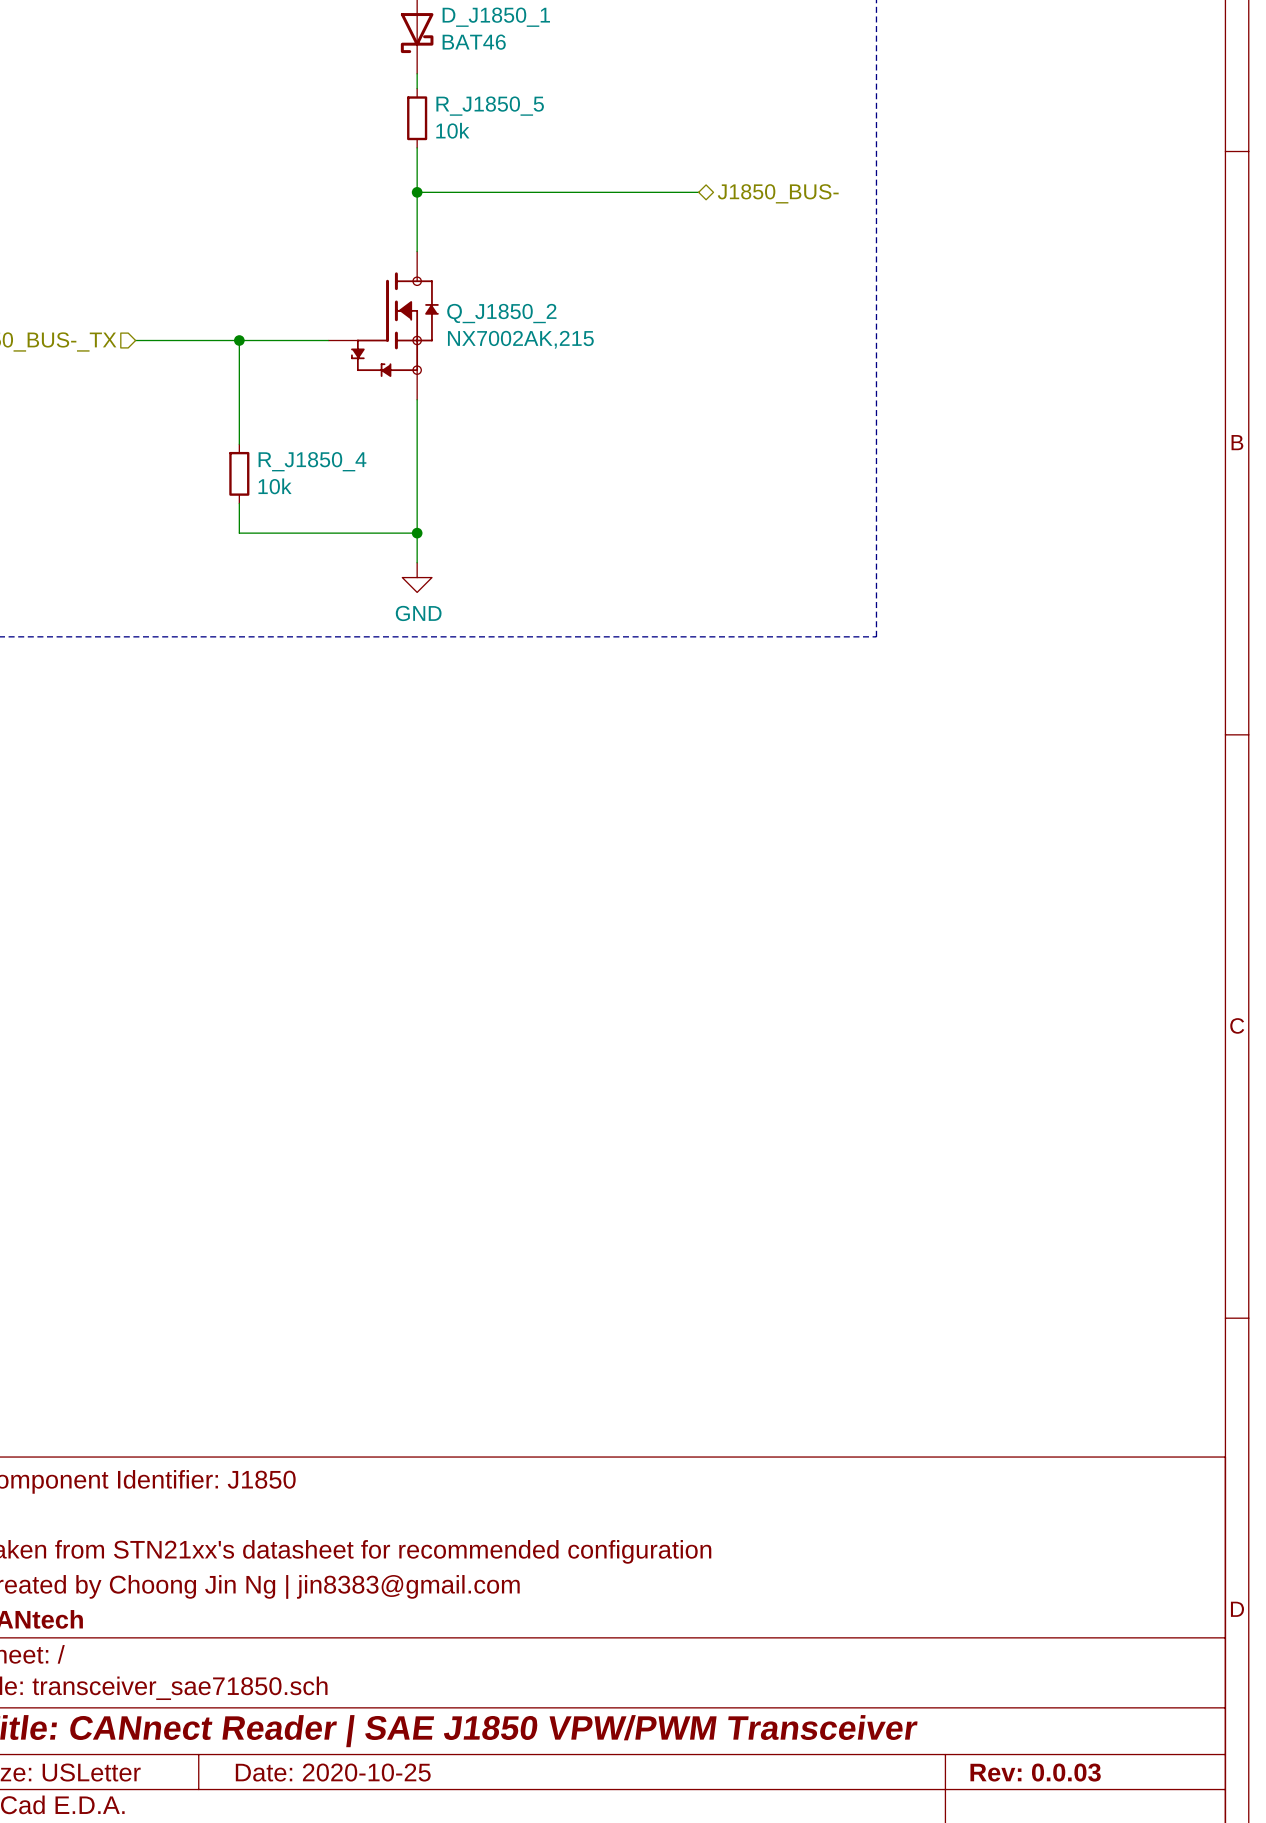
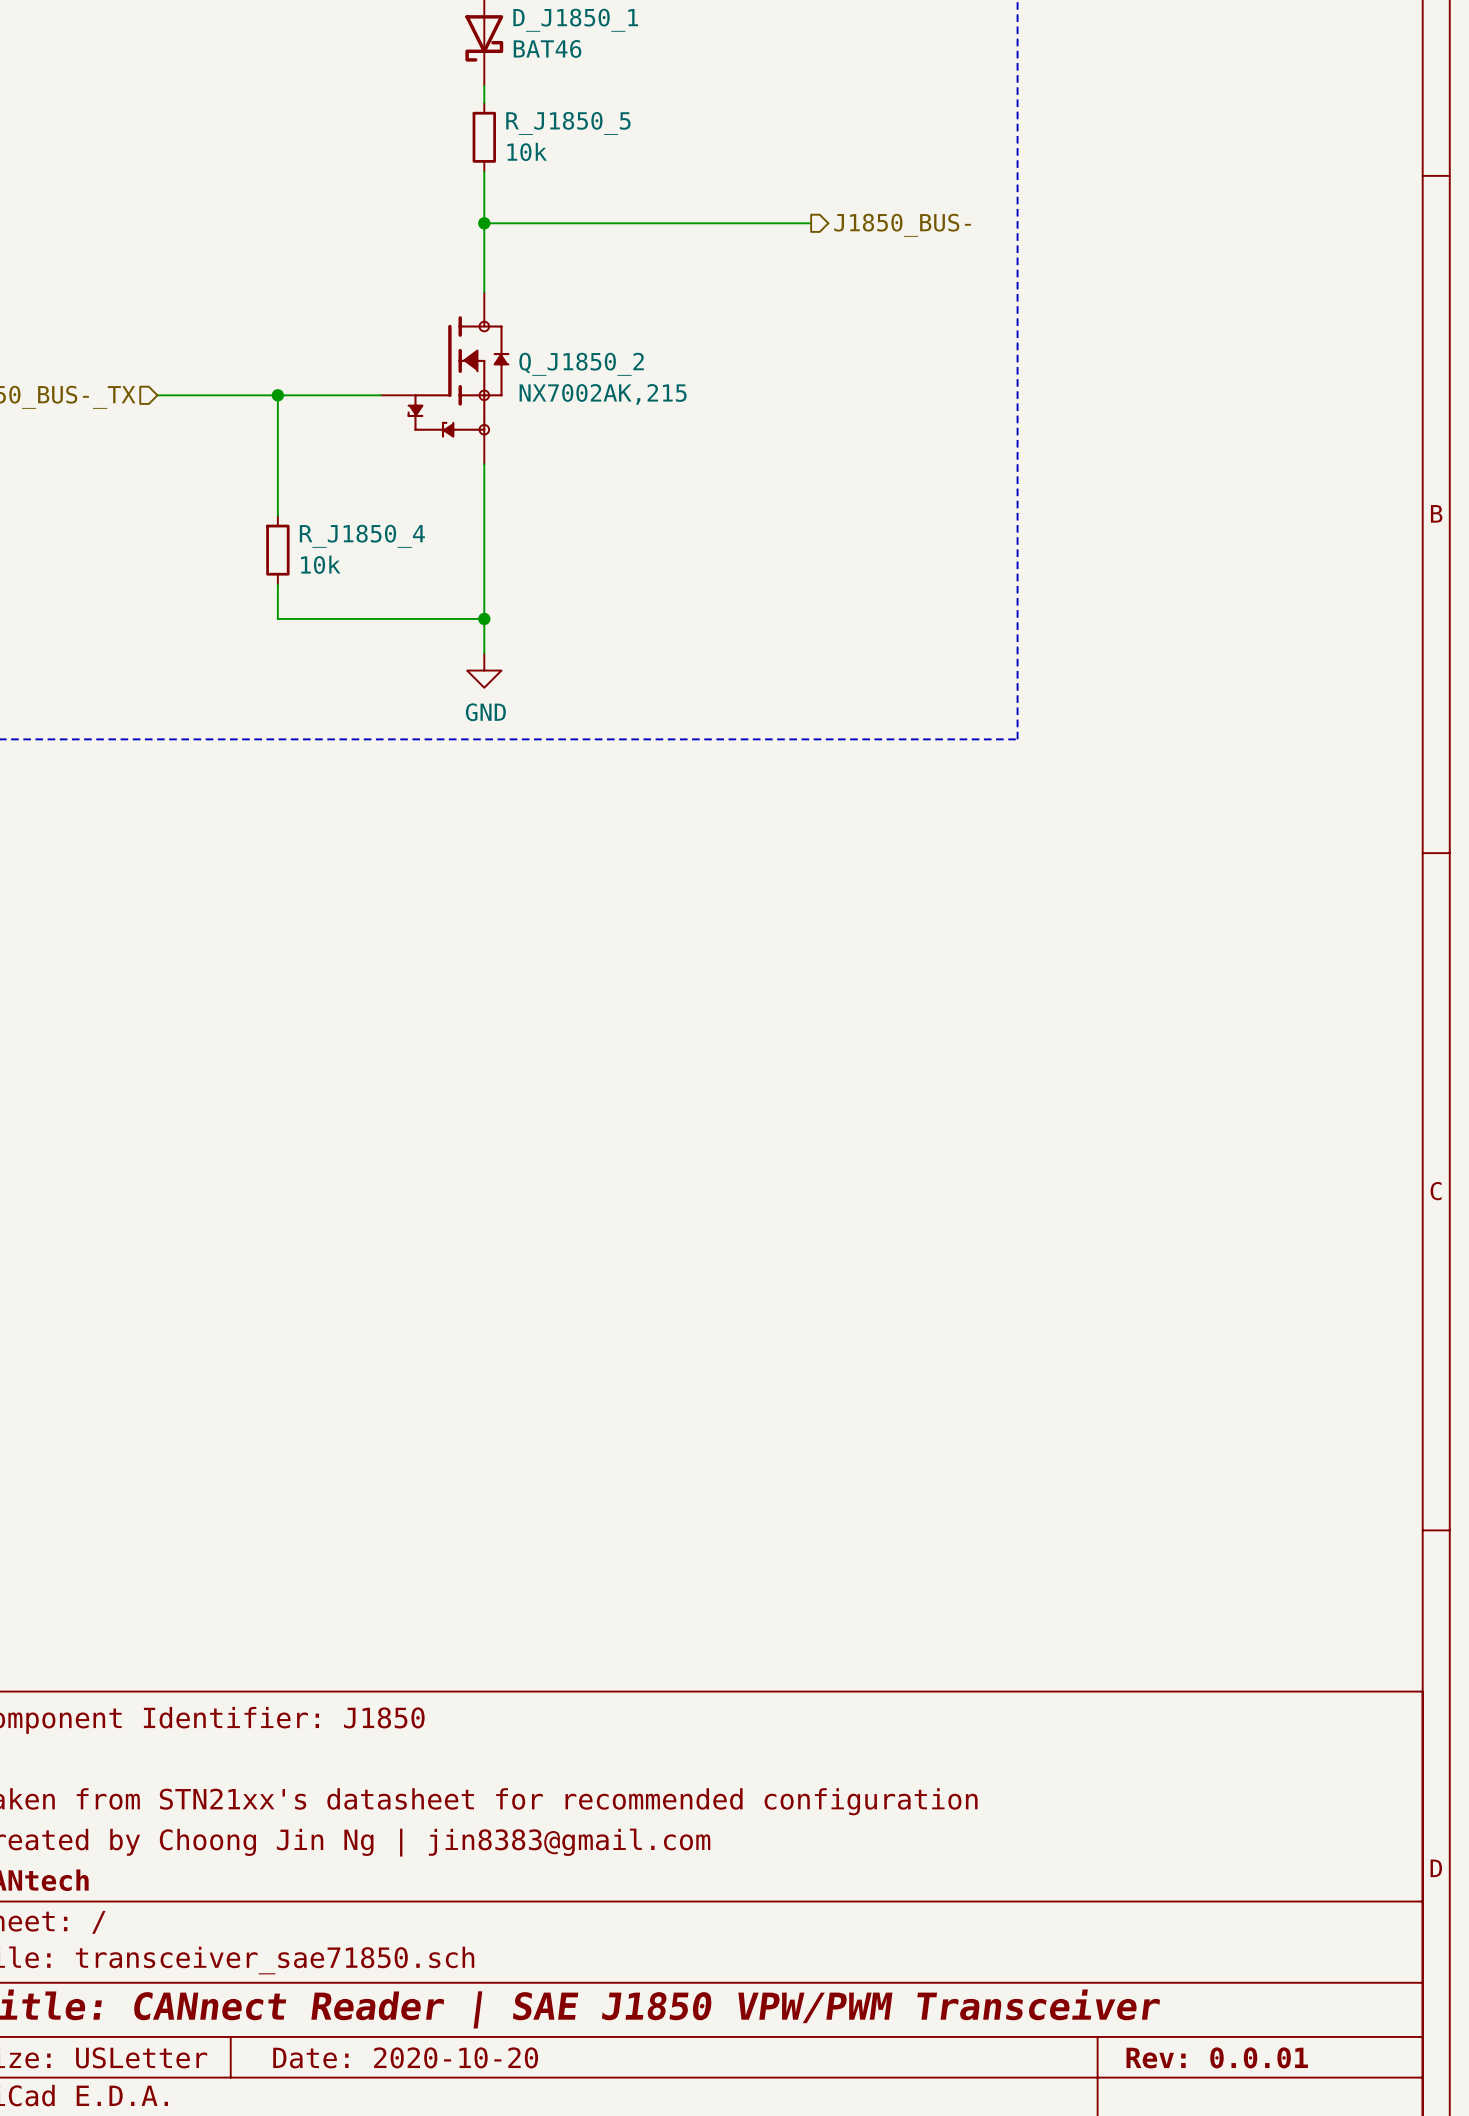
hierarchical label shape: bidirectional (778, 193) -> output (902, 225)
title block: Date: 2020-10-25 (333, 1772) -> Date: 2020-10-20 (405, 2057)
title block: Rev: 0.0.03 (1035, 1772) -> Rev: 0.0.01 (1217, 2057)

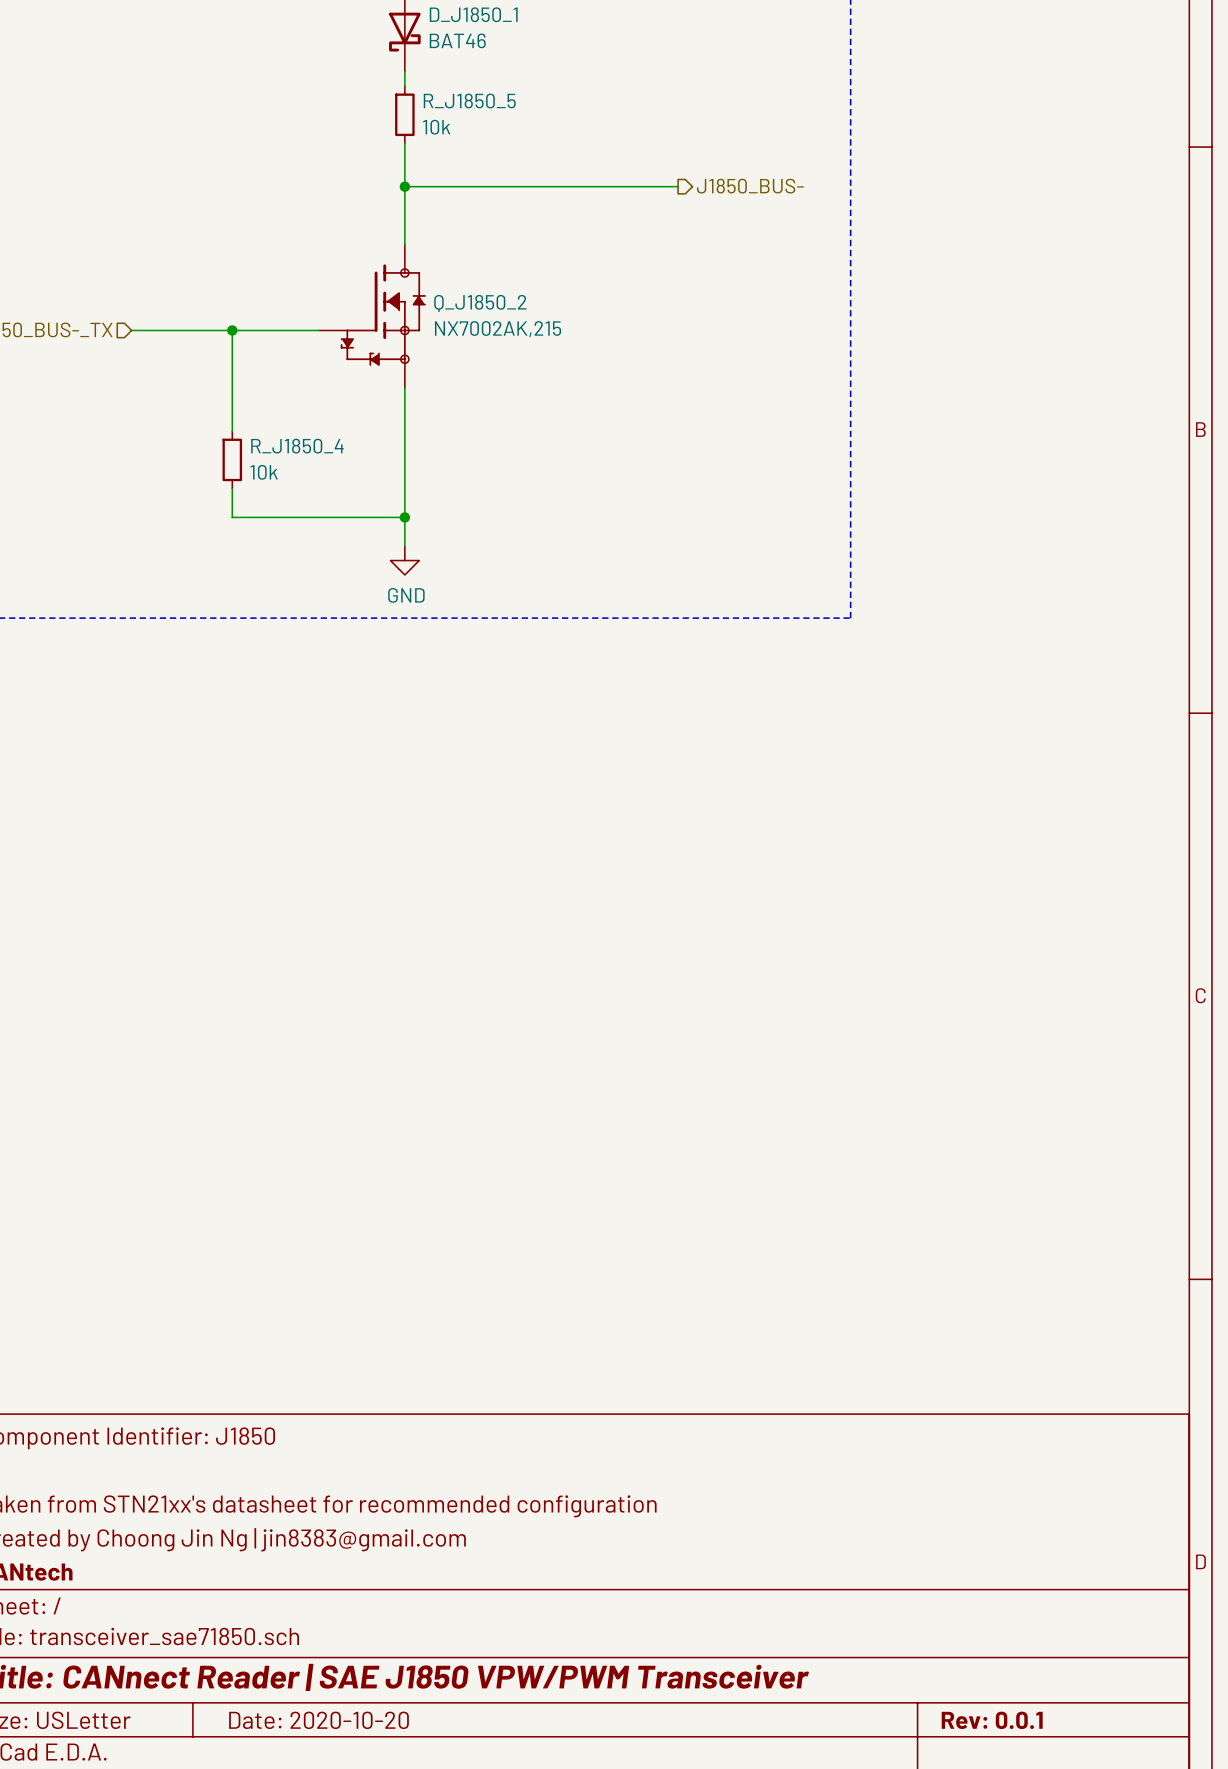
title block: Rev: 0.0.01 (1217, 2057) -> Rev: 0.0.1 (992, 1720)

